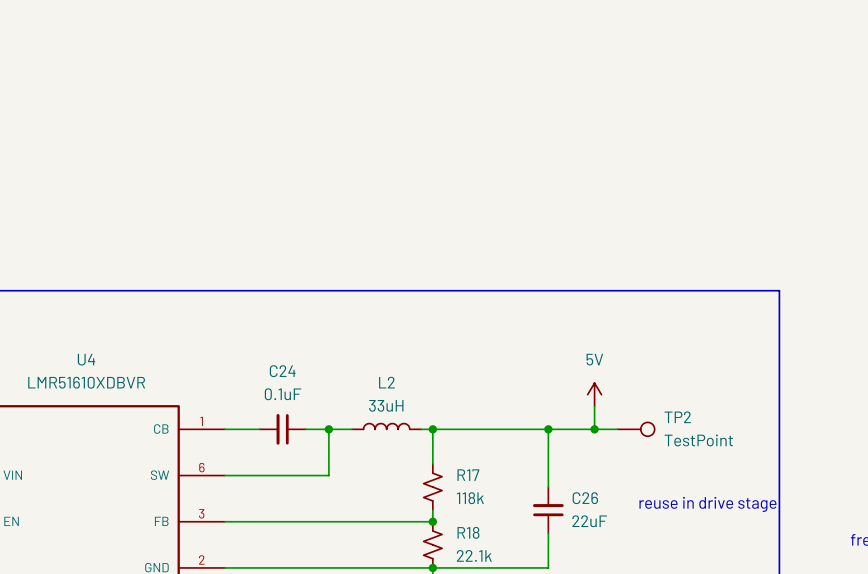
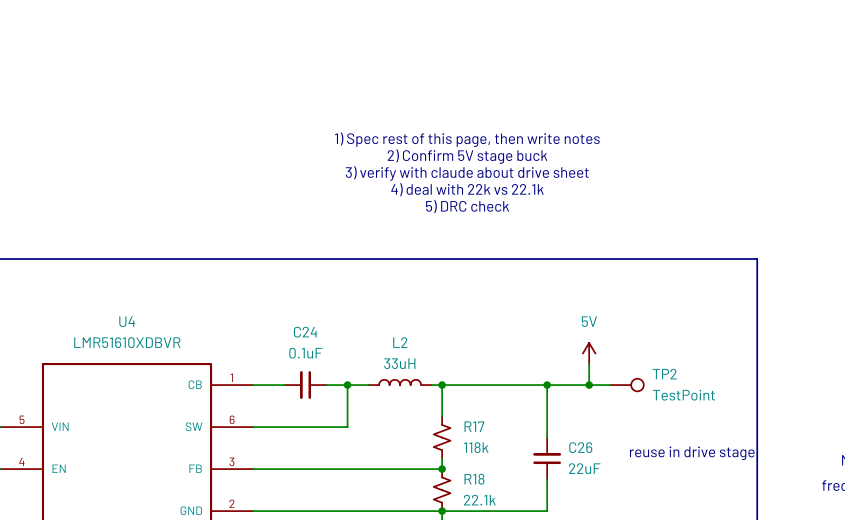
text: none -> 1) Spec rest of this page, then write notes (467, 139)
text: none -> 2) Confirm 5V stage buck (467, 156)
text: none -> 3) verify with claude about drive sheet (467, 173)
text: none -> 4) deal with 22k vs 22.1k (467, 189)
text: none -> 5) DRC check (467, 206)

